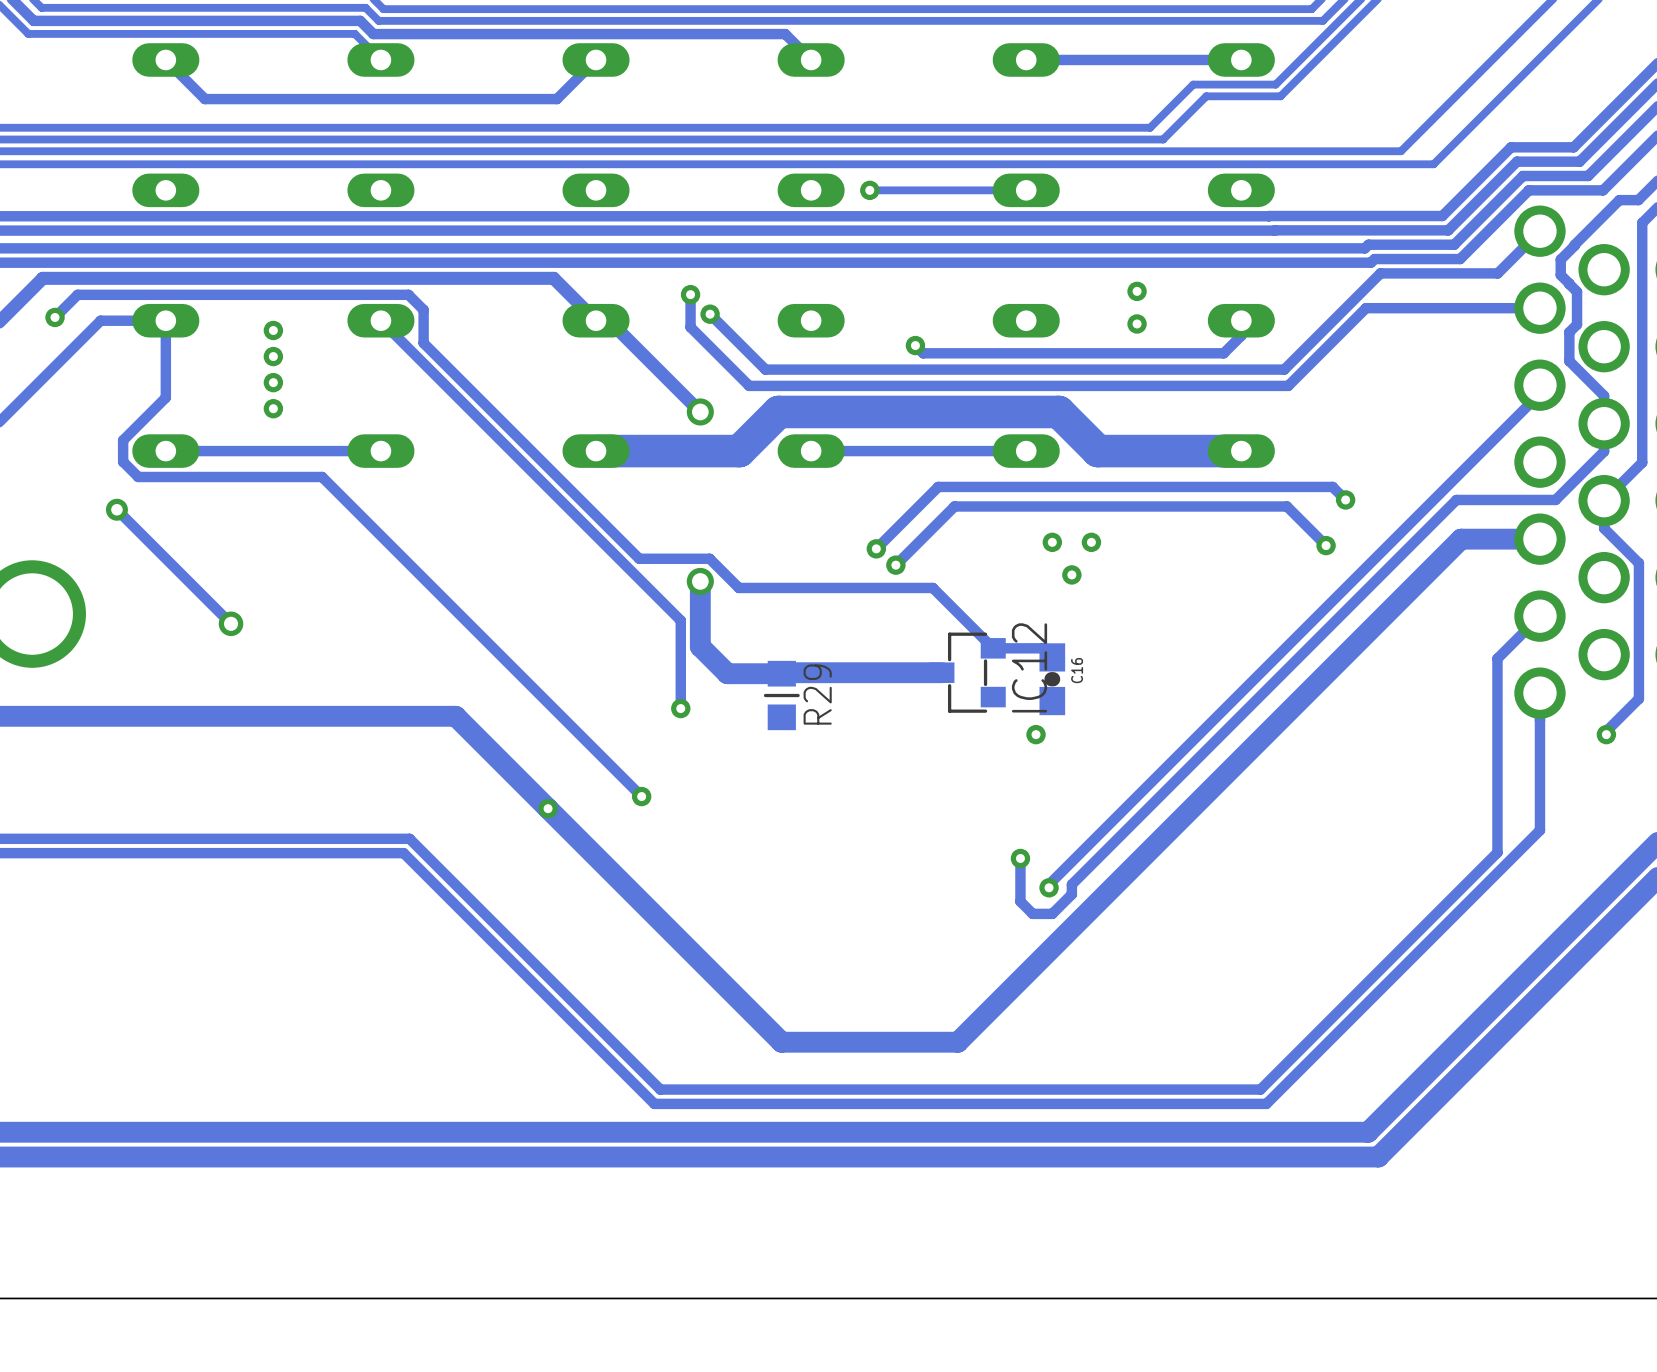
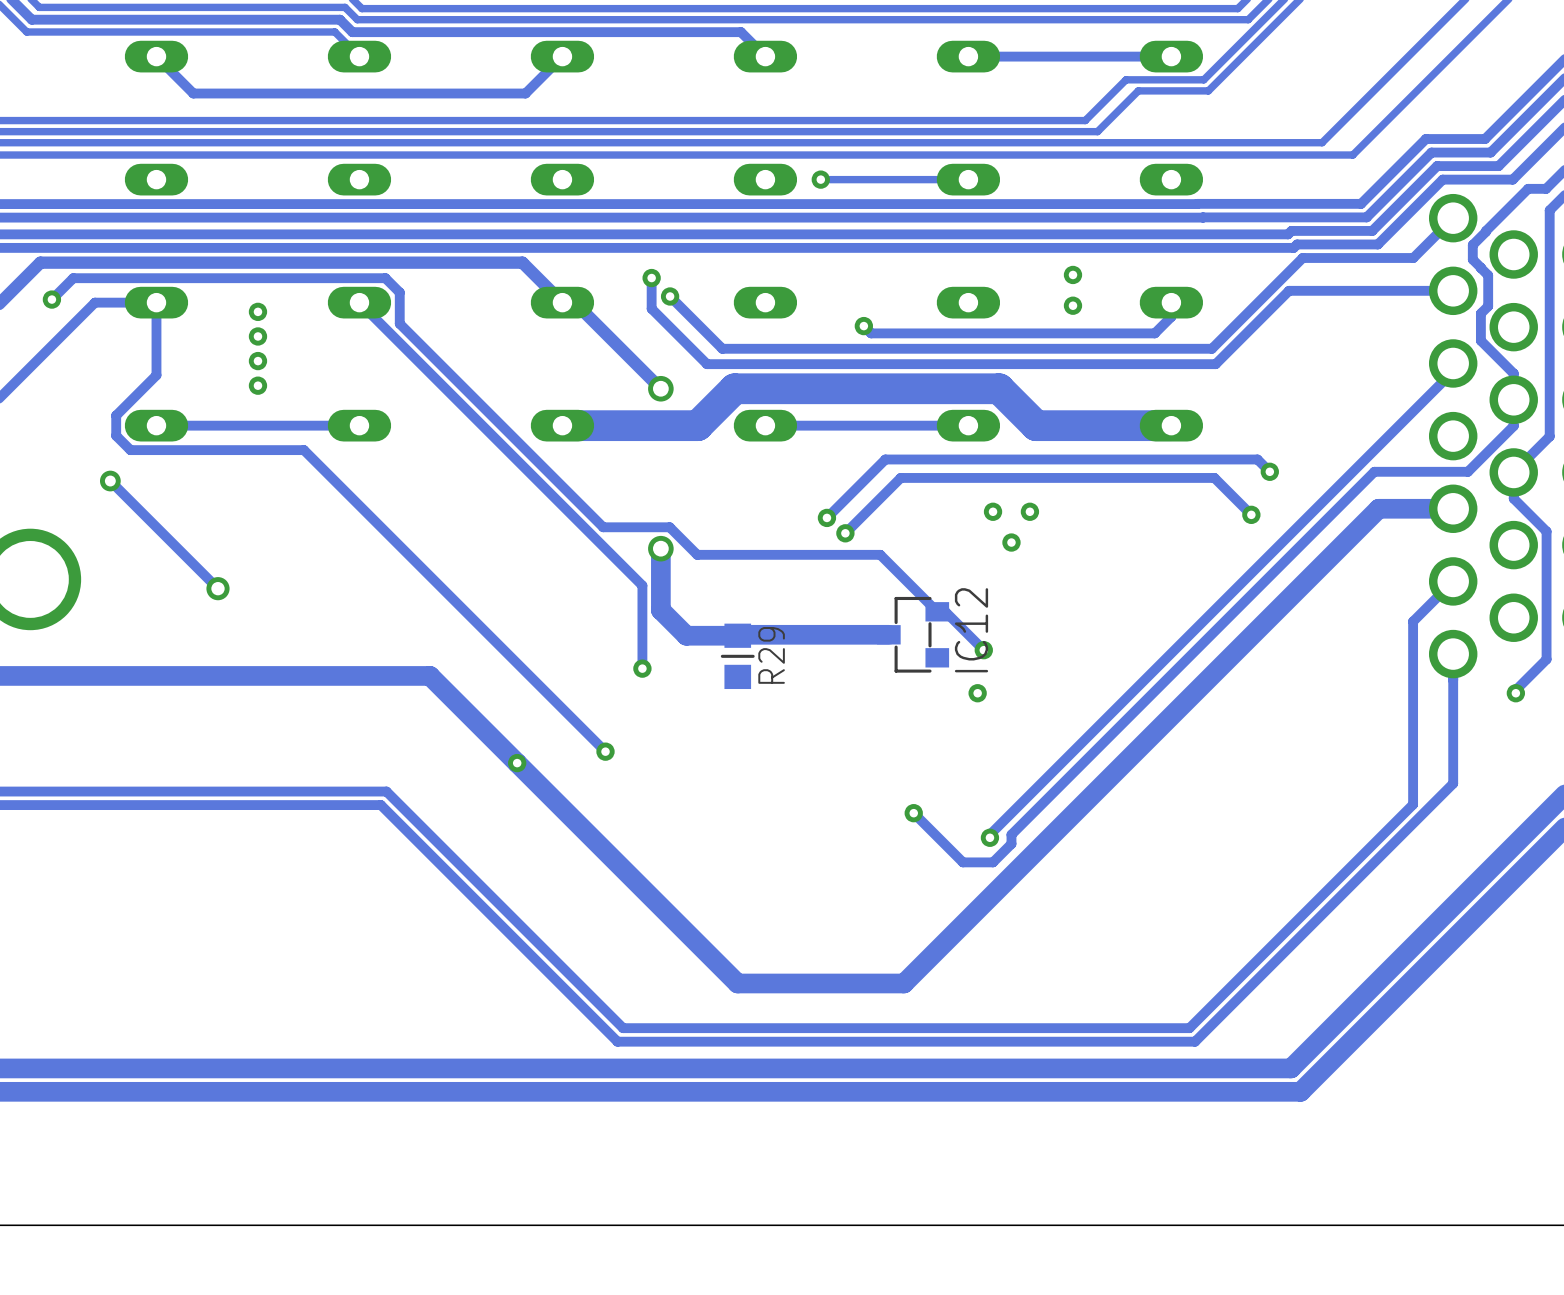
track: (1001, 648) (1043, 648) (1052, 657) -> (945, 611) (983, 650)
C16: (1052, 679) -> none
via: none -> (983, 650)
track: (1020, 858) (1020, 901) (1032, 913) -> (913, 813) (962, 862) (974, 862)
via position: (1020, 858) -> (913, 813)

